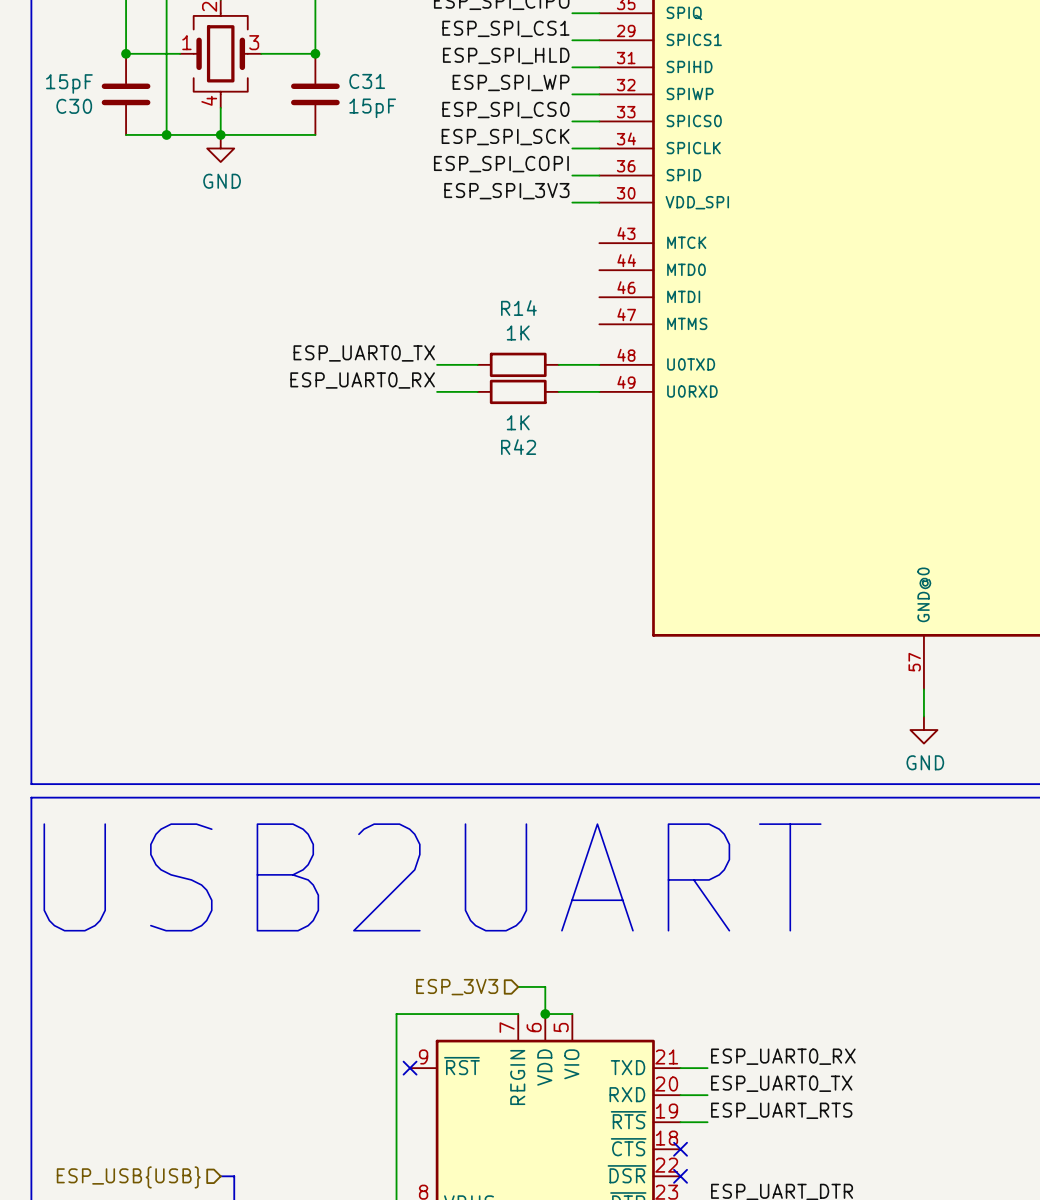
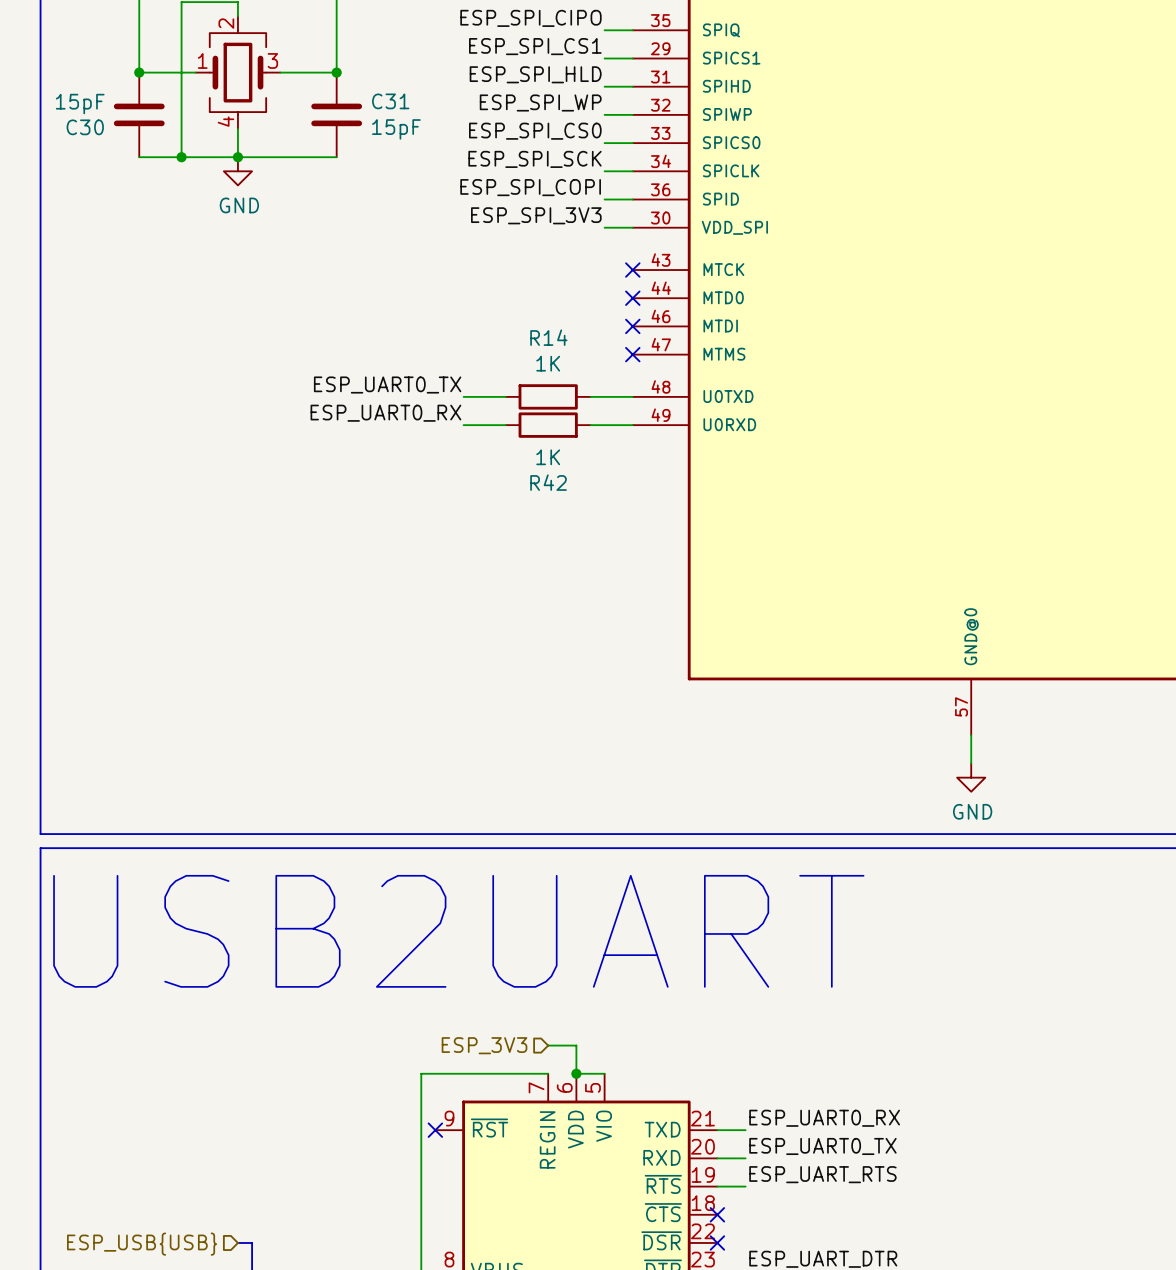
no-connect mark: none -> (632, 270)
no-connect mark: none -> (632, 298)
no-connect mark: none -> (632, 326)
no-connect mark: none -> (632, 354)

